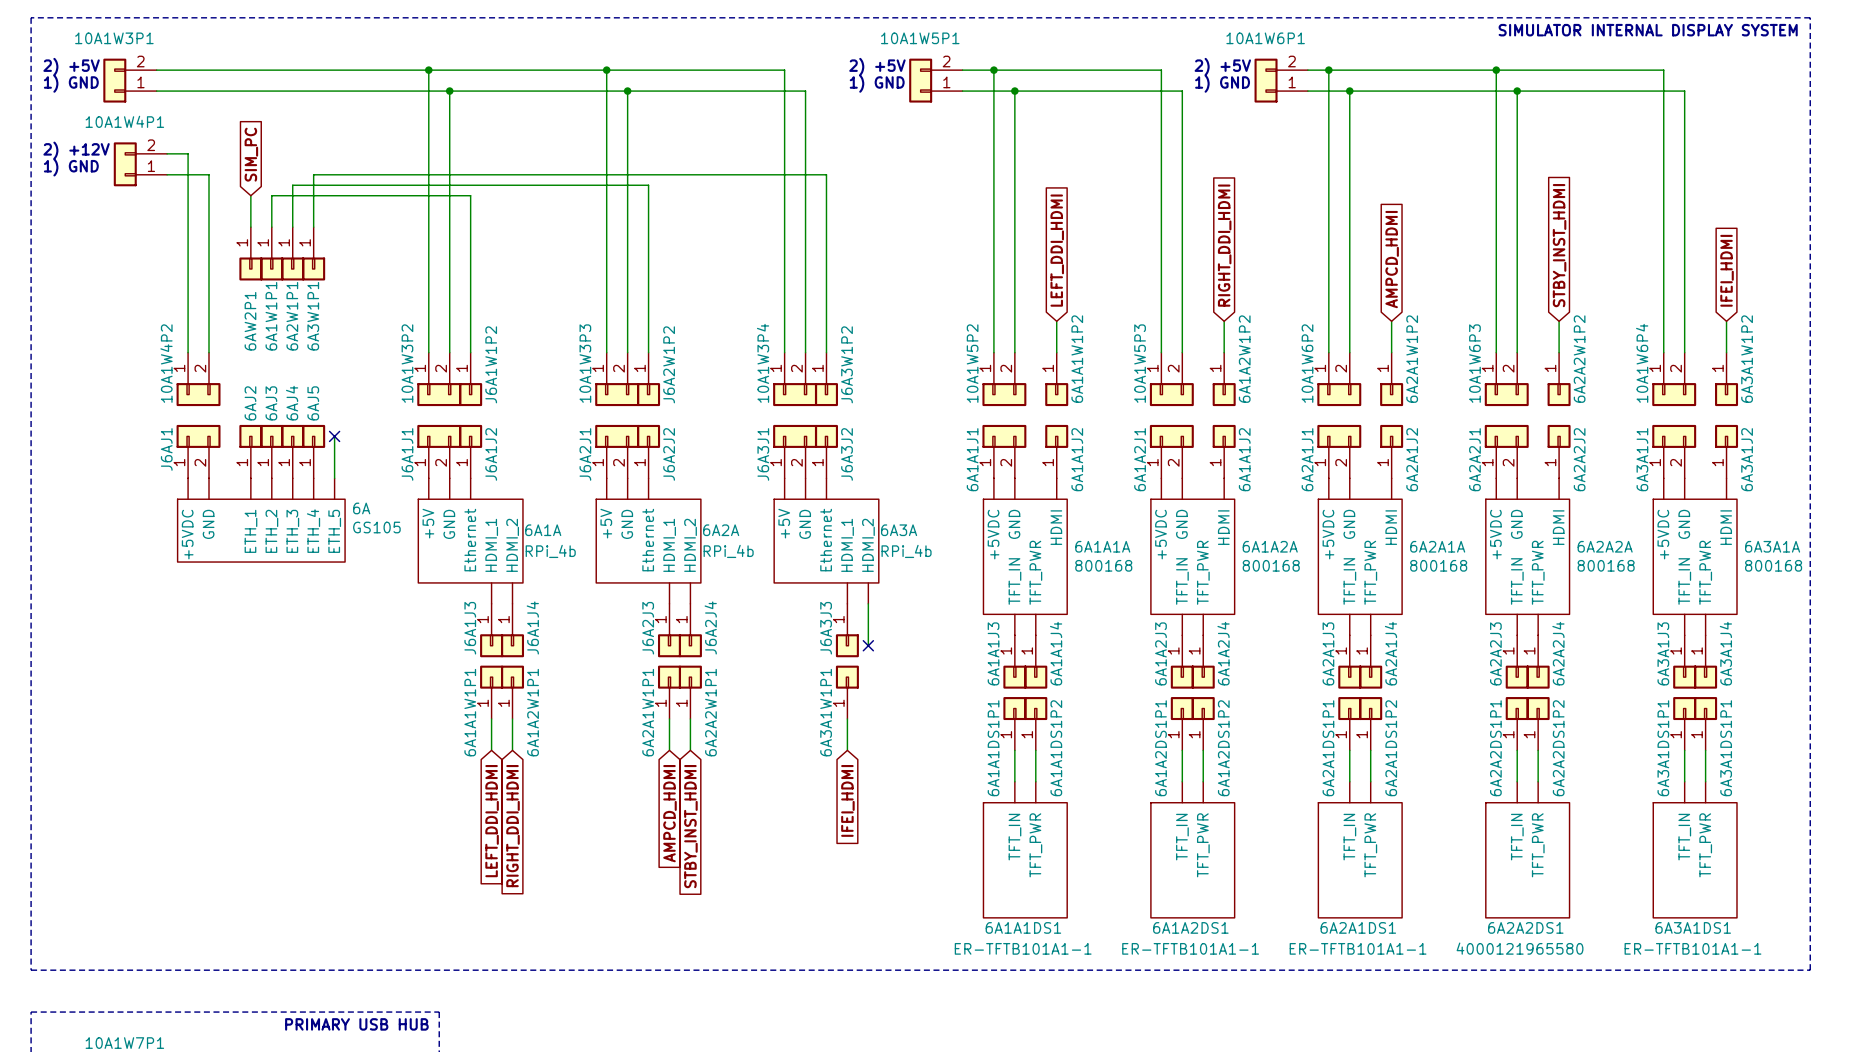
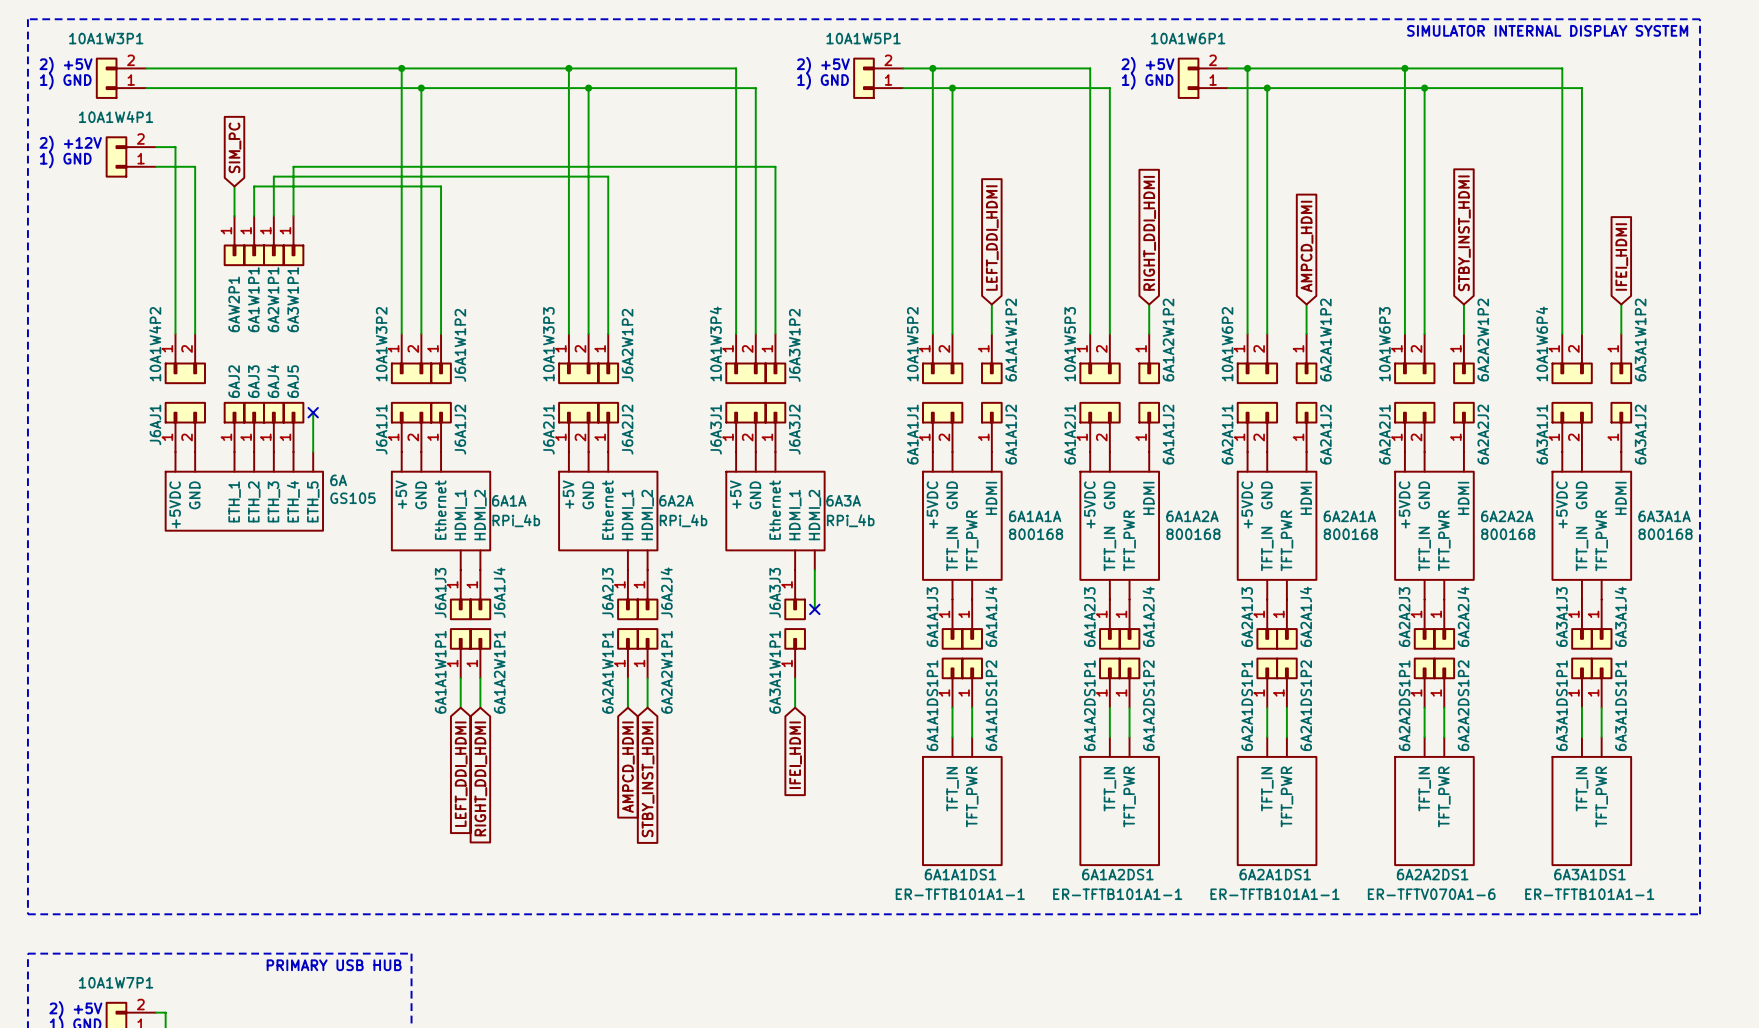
6A2A2DS1 value: 4000121965580 (1520, 948) -> ER-TFTV070A1-6 (1431, 894)

